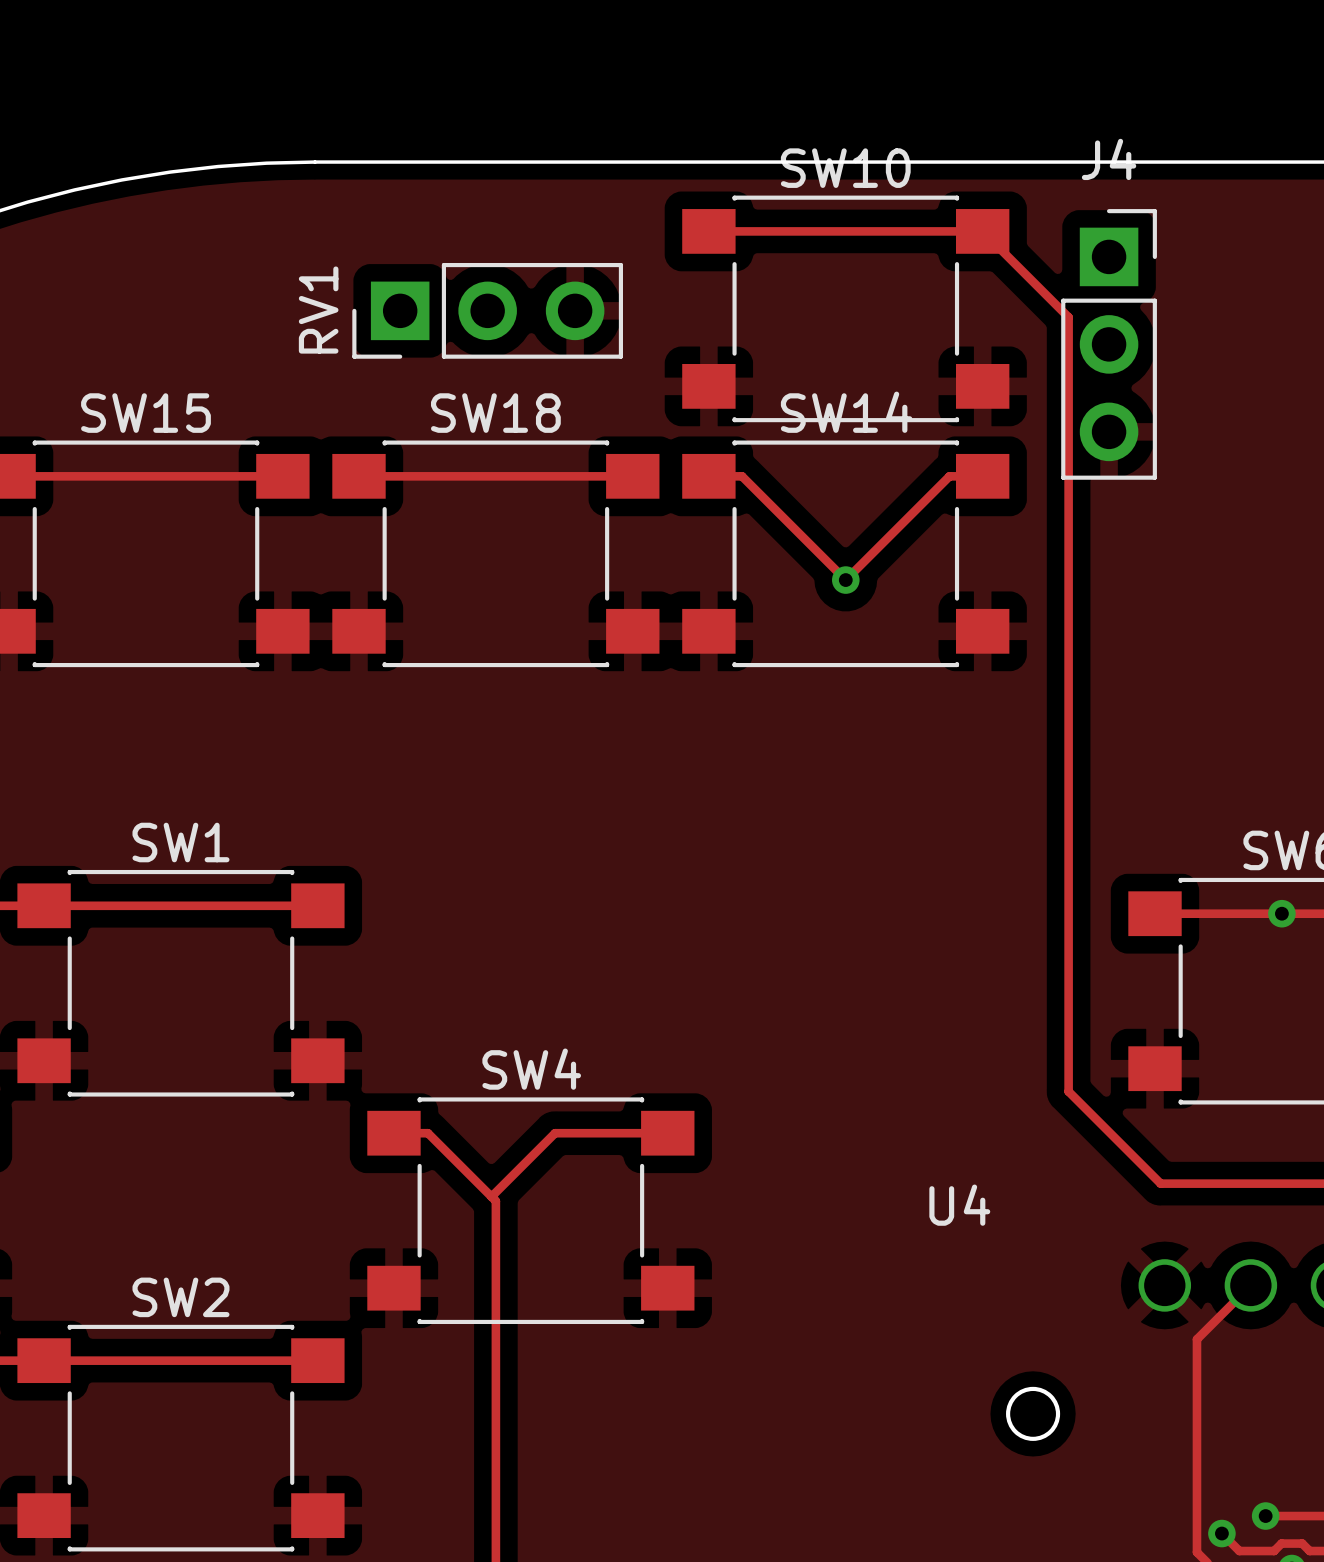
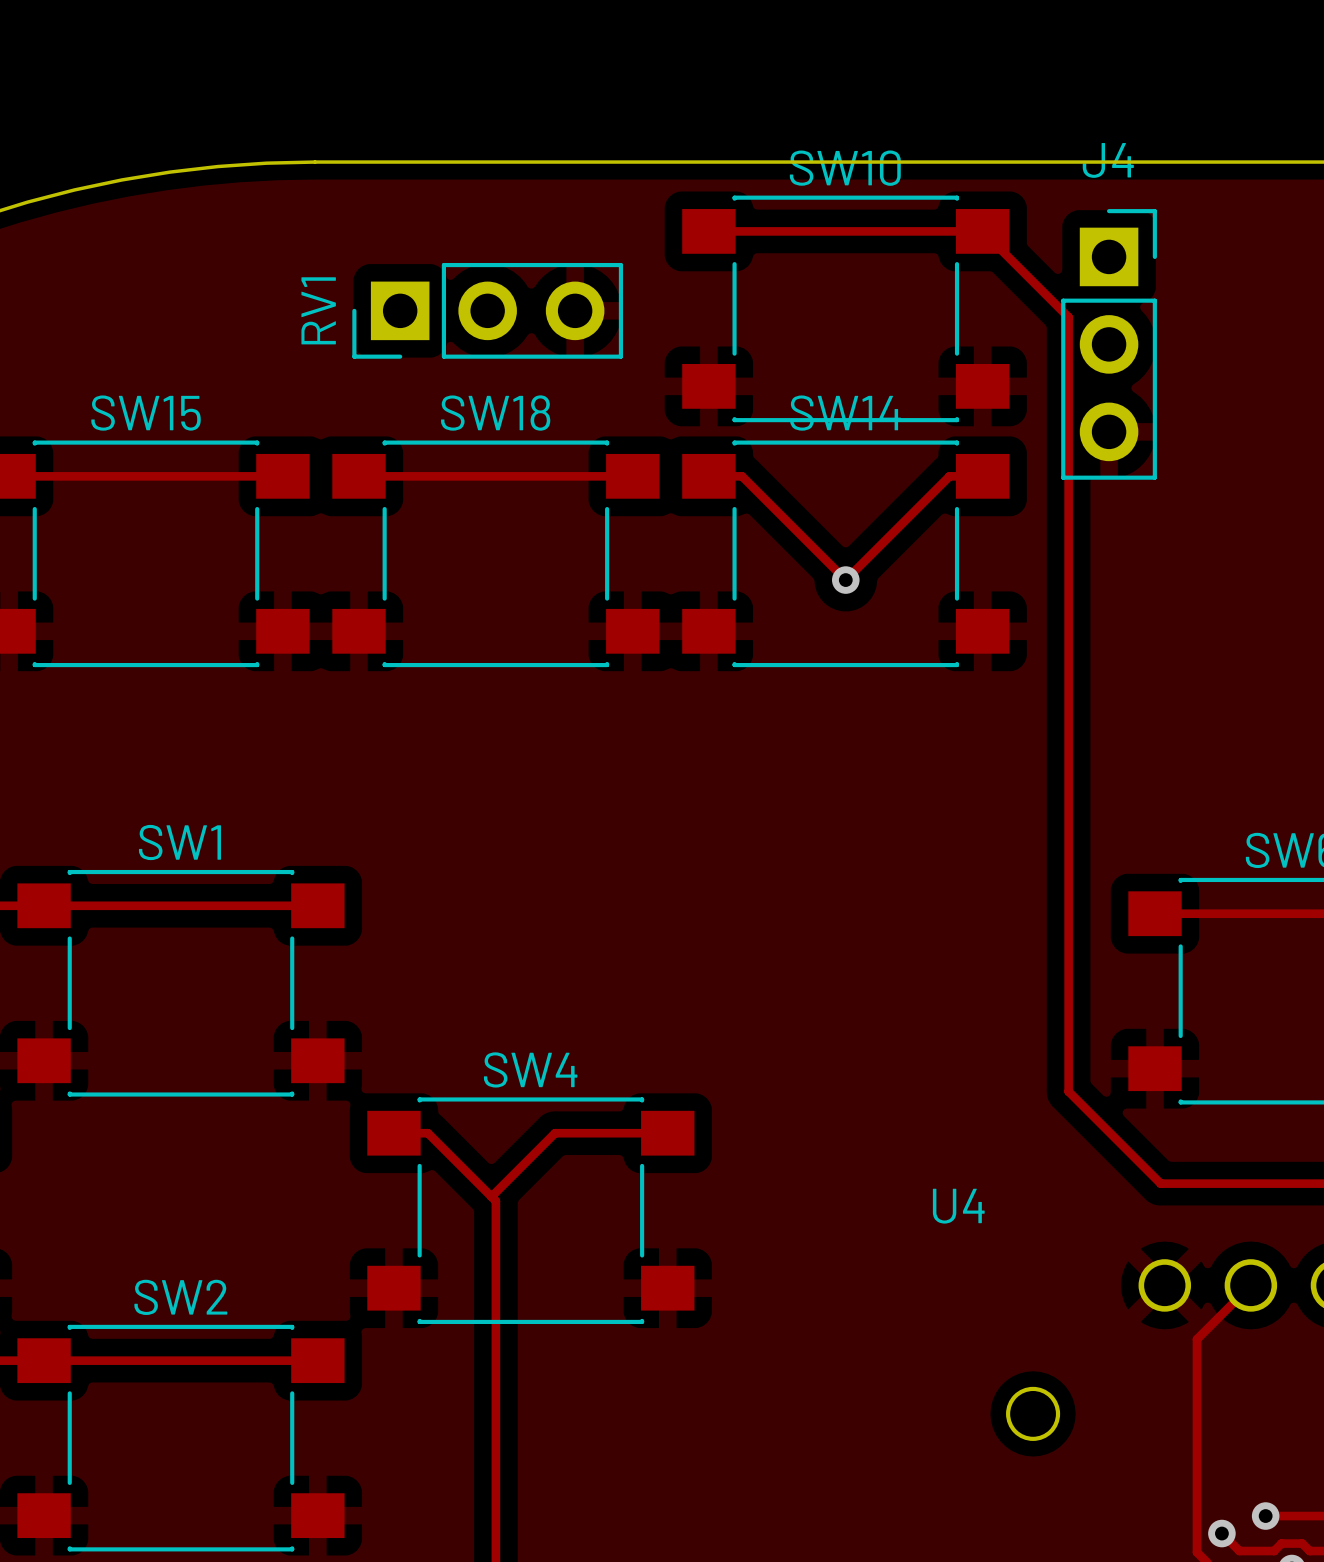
via: (1281, 913) -> none

